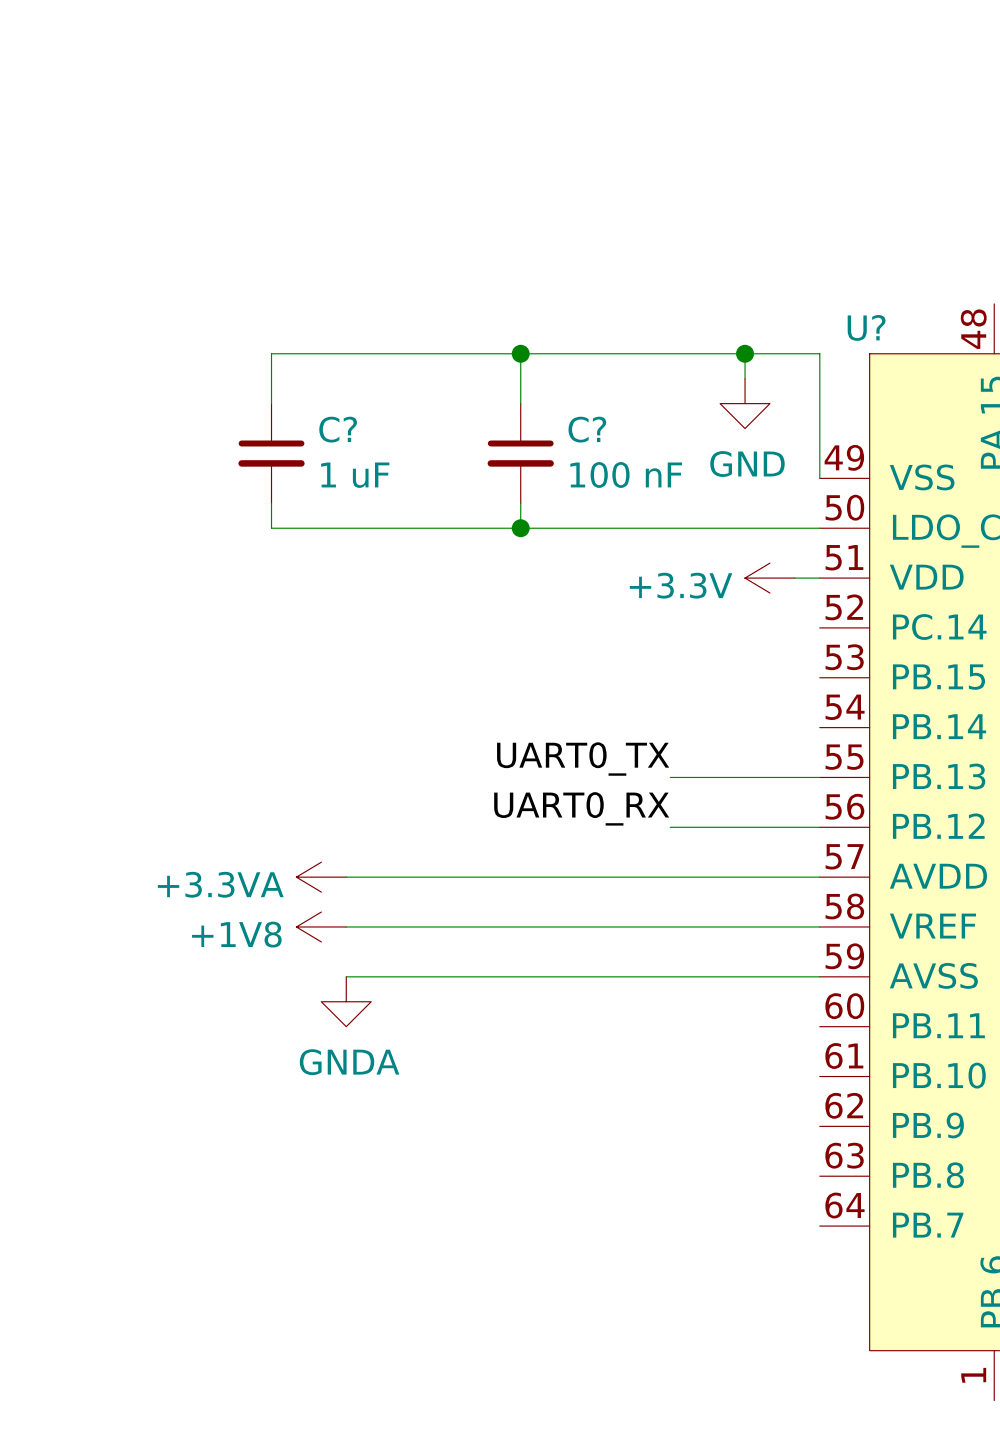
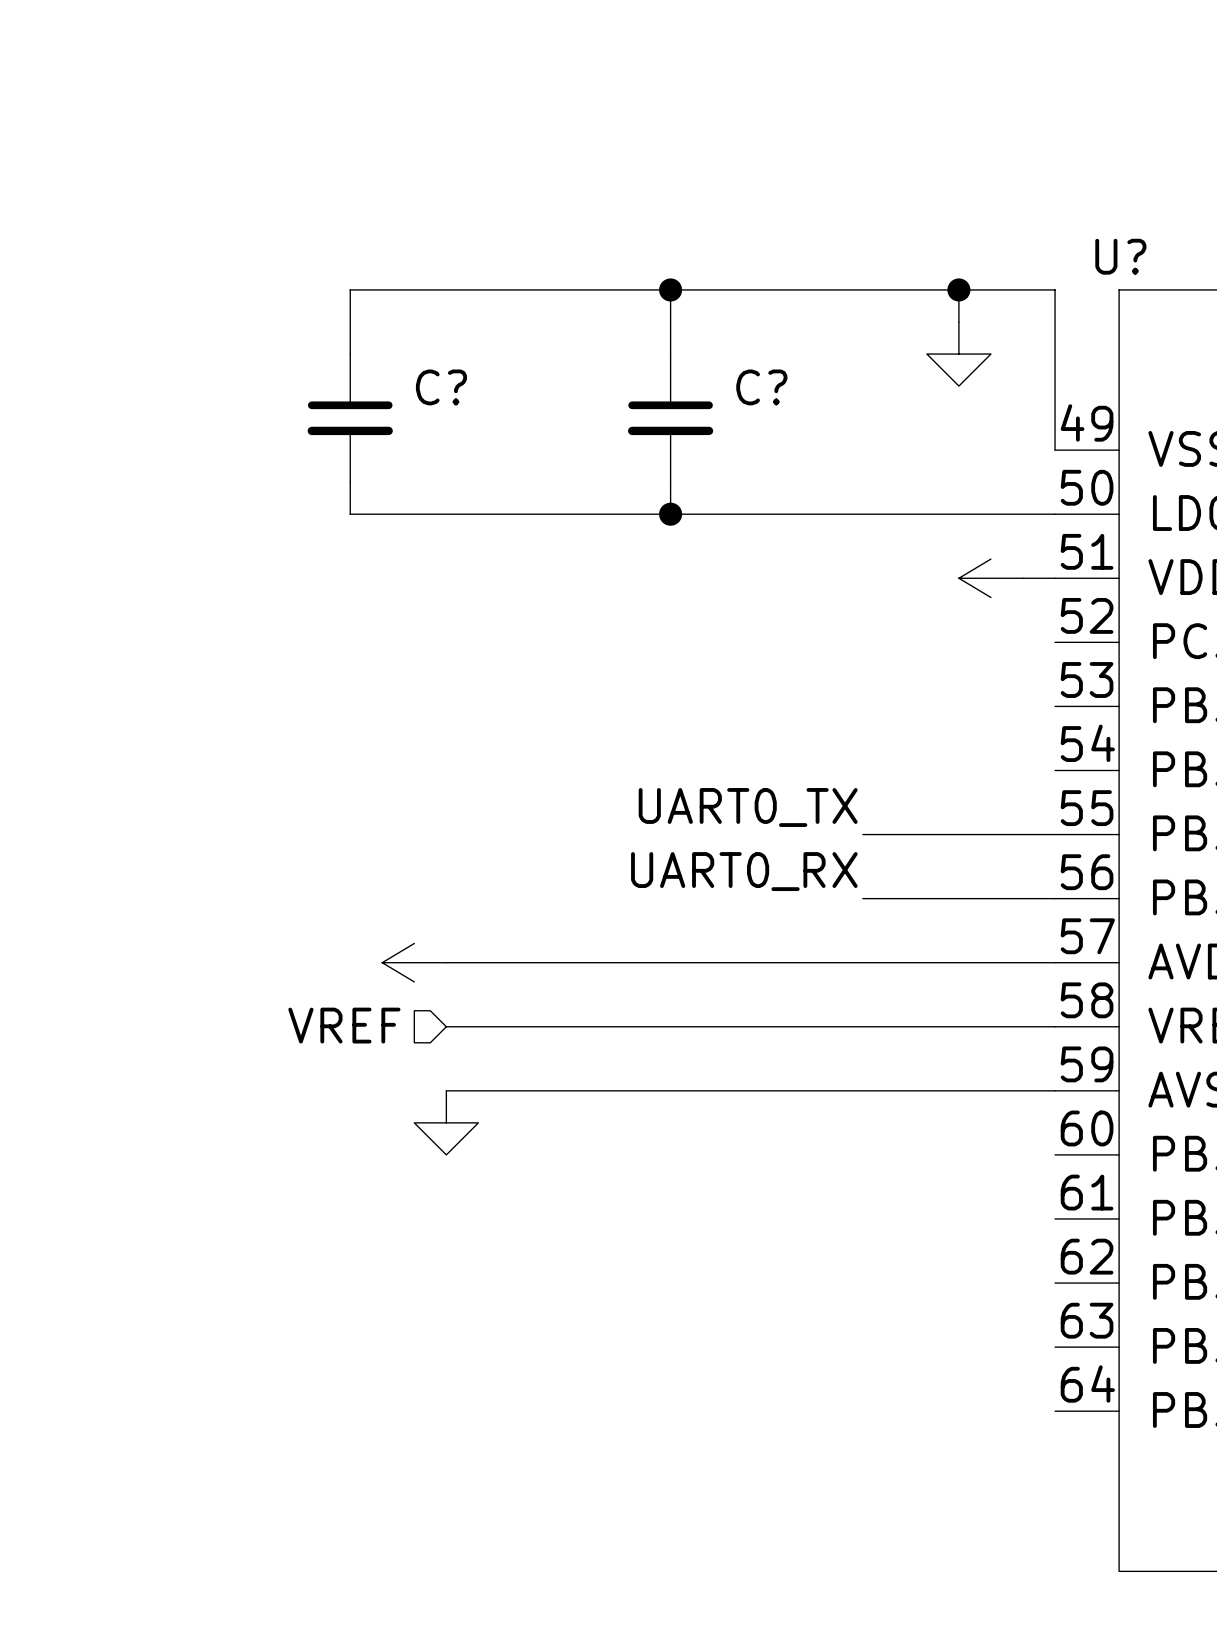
power symbol text: GND (747, 464) -> none
C? value: 100 nF (626, 474) -> none
C? value: 1 uF (355, 475) -> none
power symbol text: +3.3V (681, 585) -> none
power symbol text: +3.3VA (220, 884) -> none
hierarchical label: none -> VREF (344, 1025)
power symbol: +1V8 (321, 926) -> none
power symbol text: GNDA (349, 1062) -> none

